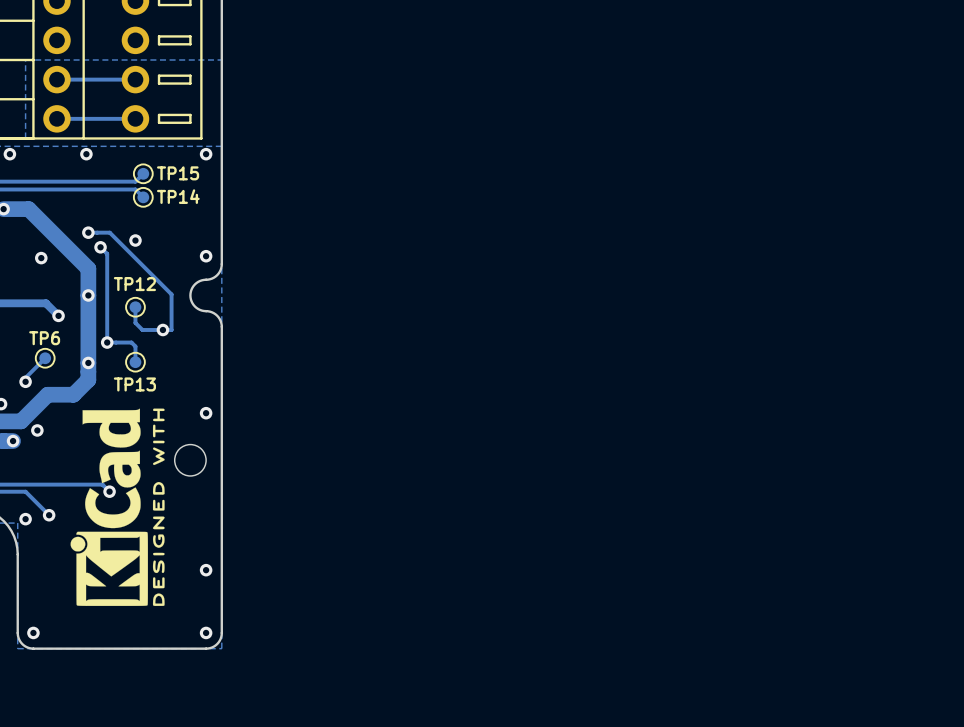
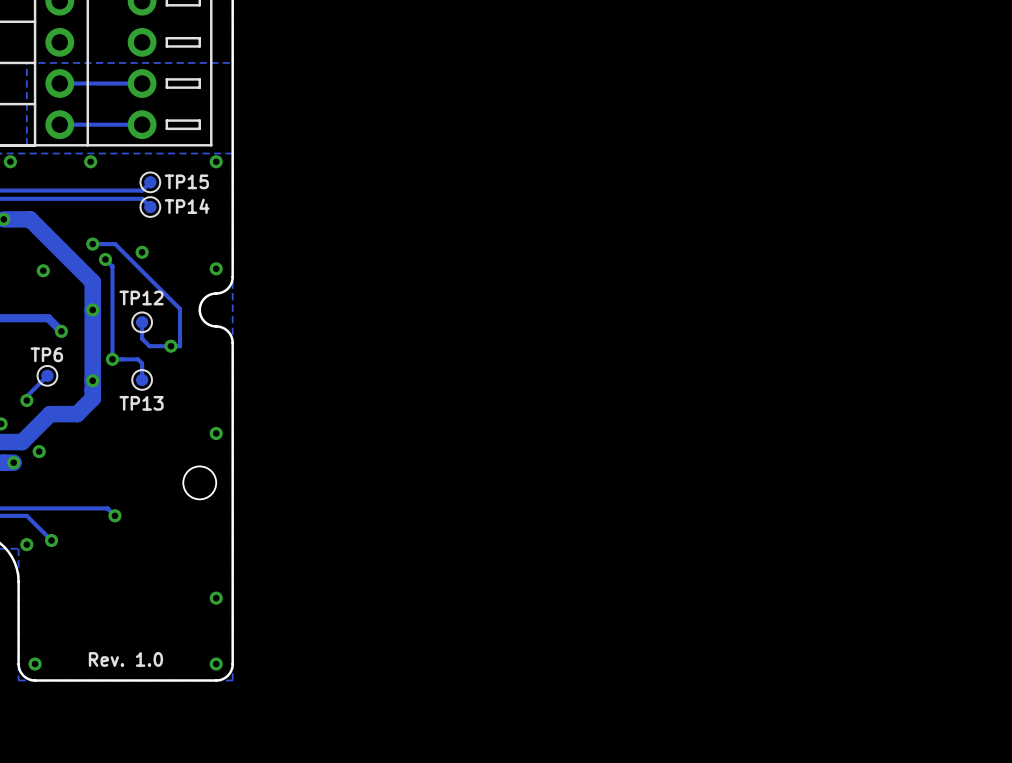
drawing: [70, 408, 165, 606] -> none
text: none -> Rev. 1.0 (125, 659)

